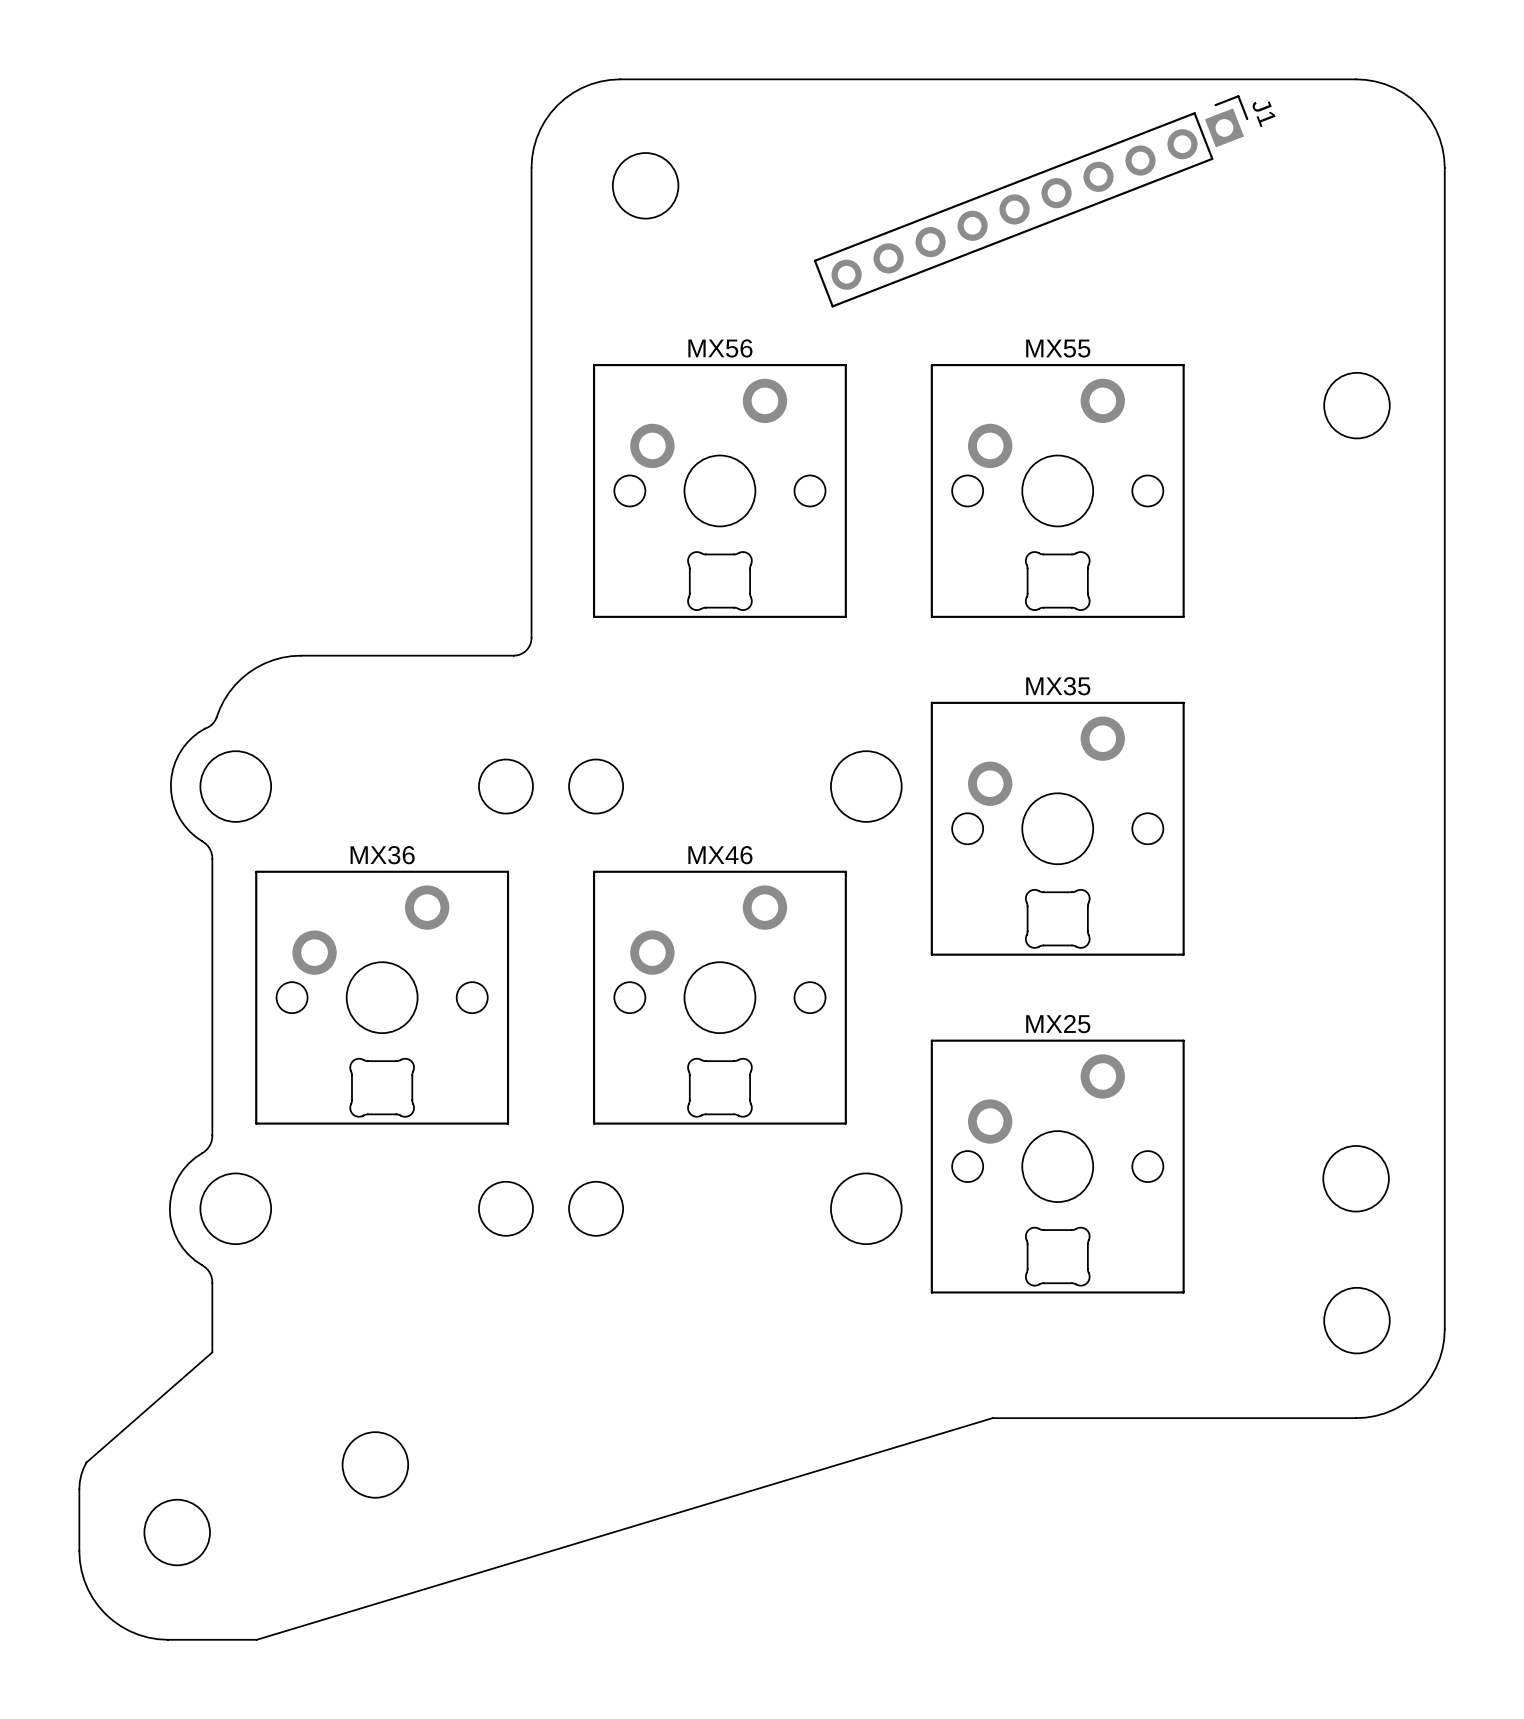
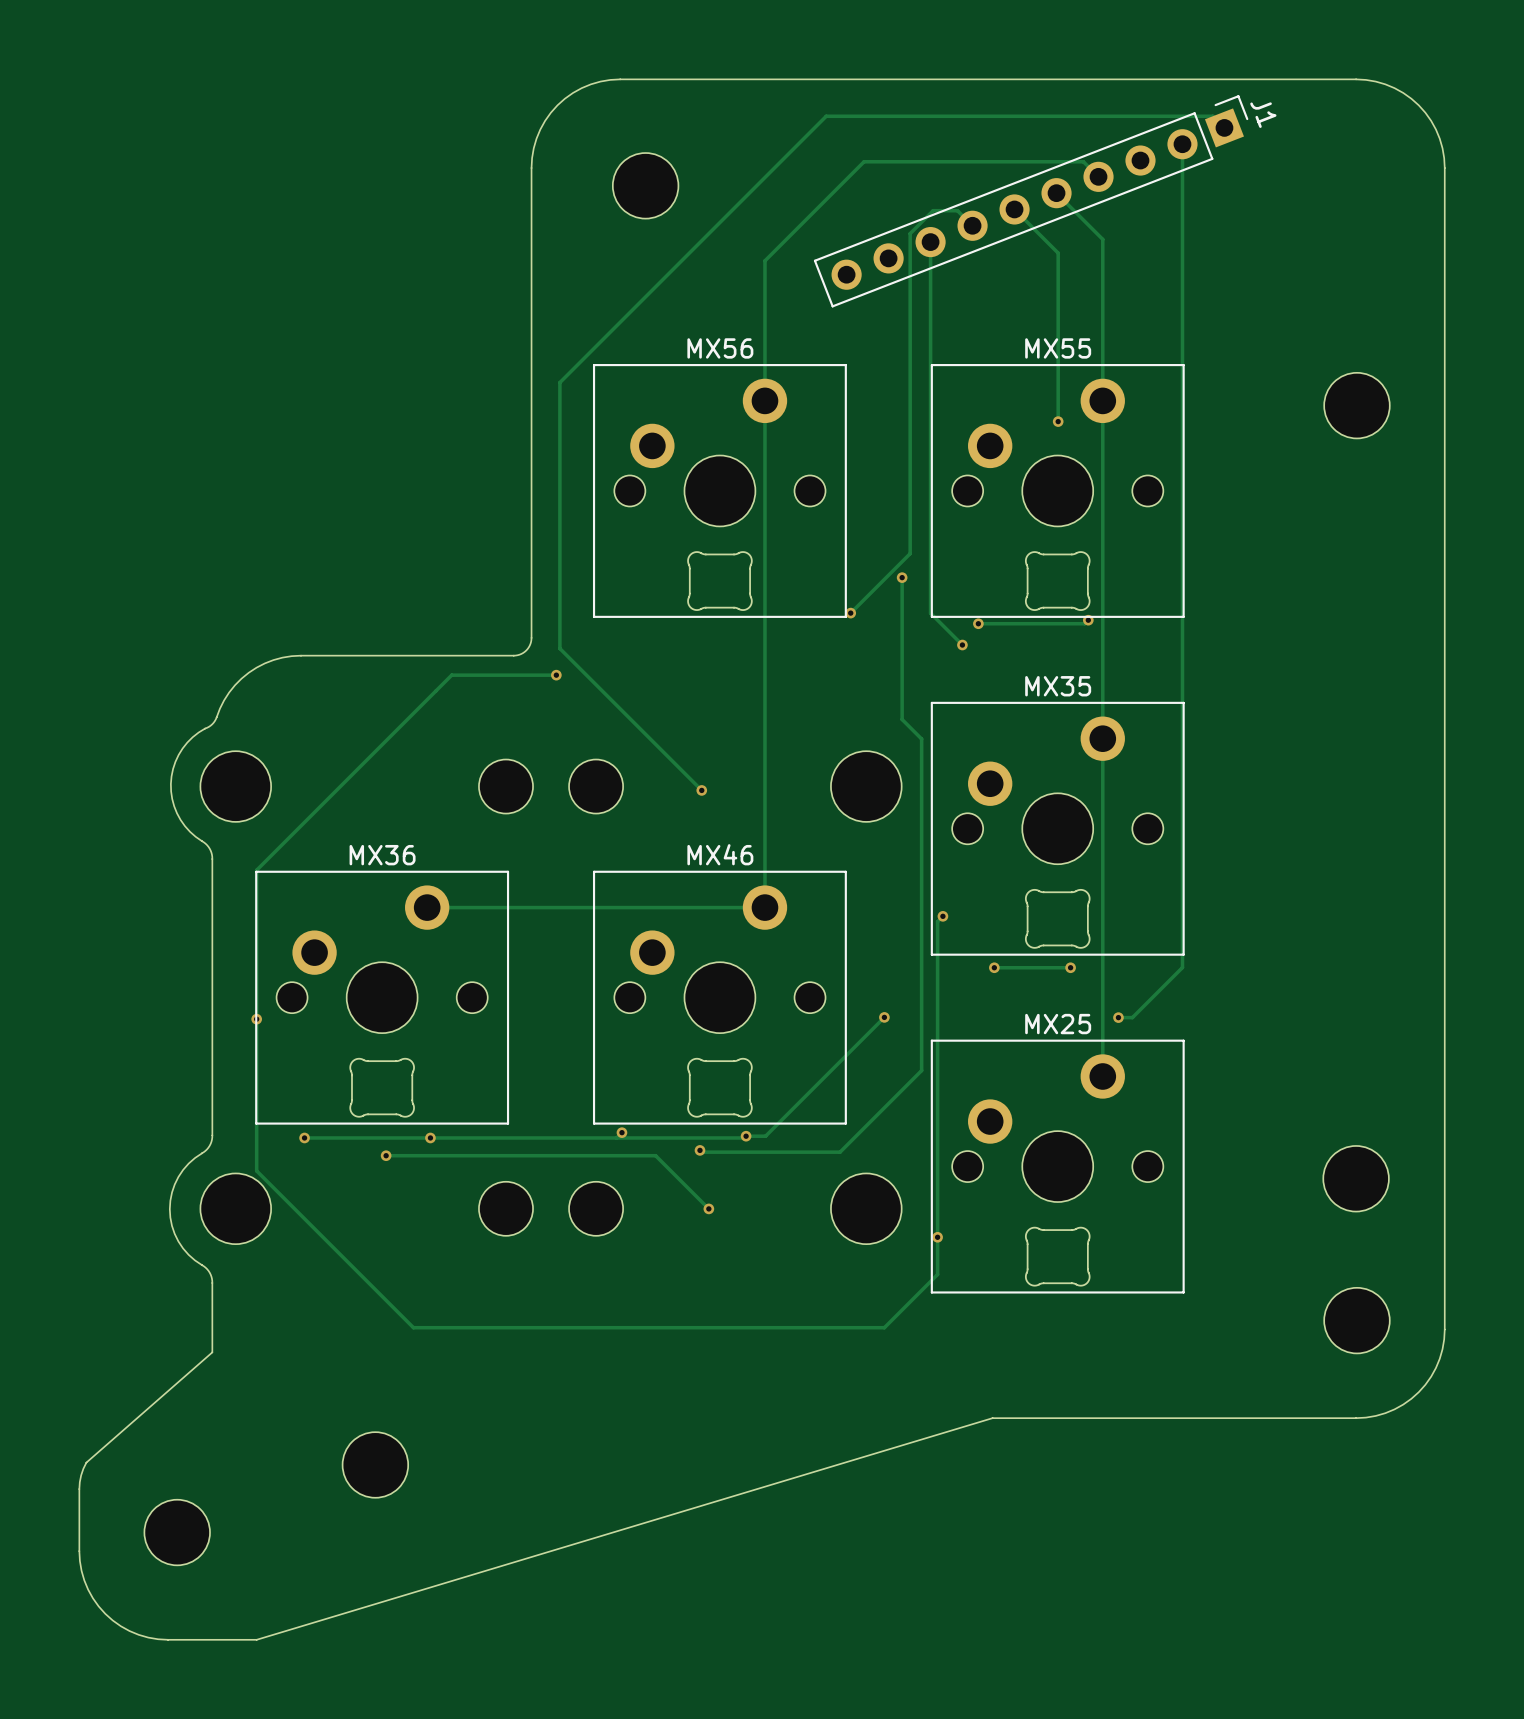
track: none -> (1224, 127) (1212, 116) (826, 116) (559, 382) (559, 648) (701, 790)
track: none -> (1182, 144) (1182, 967) (1132, 1017) (1118, 1017)
track: none -> (1098, 176) (1083, 161) (864, 161) (764, 260) (764, 907) (427, 907)
track: none -> (1056, 193) (1102, 239) (1102, 1076)
track: none -> (1014, 209) (1058, 253) (1058, 421)
track: none -> (972, 225) (957, 210) (933, 210) (910, 233) (910, 553) (850, 613)
track: none -> (930, 242) (930, 613) (962, 645)
via: none -> (1058, 421)
track: none -> (902, 577) (902, 719) (921, 739) (921, 1070) (840, 1152) (701, 1152) (699, 1150)
via: none -> (902, 577)
via: none -> (850, 613)
track: none -> (1088, 620) (1084, 623) (978, 623)
via: none -> (1088, 620)
via: none -> (978, 623)
via: none -> (962, 645)
track: none -> (556, 675) (451, 675) (256, 870) (256, 1170) (413, 1327) (884, 1327) (937, 1274) (937, 921) (942, 916)
via: none -> (556, 675)
via: none -> (701, 790)
via: none -> (942, 916)
track: none -> (994, 967) (1070, 967)
via: none -> (994, 967)
via: none -> (1070, 967)
track: none -> (884, 1017) (765, 1136) (746, 1136) (744, 1137) (304, 1137)
via: none -> (884, 1017)
via: none -> (1118, 1017)
via: none -> (256, 1019)
via: none -> (621, 1132)
via: none -> (746, 1136)
via: none -> (304, 1137)
via: none -> (430, 1137)
via: none -> (699, 1150)
track: none -> (386, 1155) (655, 1155) (708, 1208)
via: none -> (386, 1155)
via: none -> (708, 1208)
via: none -> (937, 1237)

